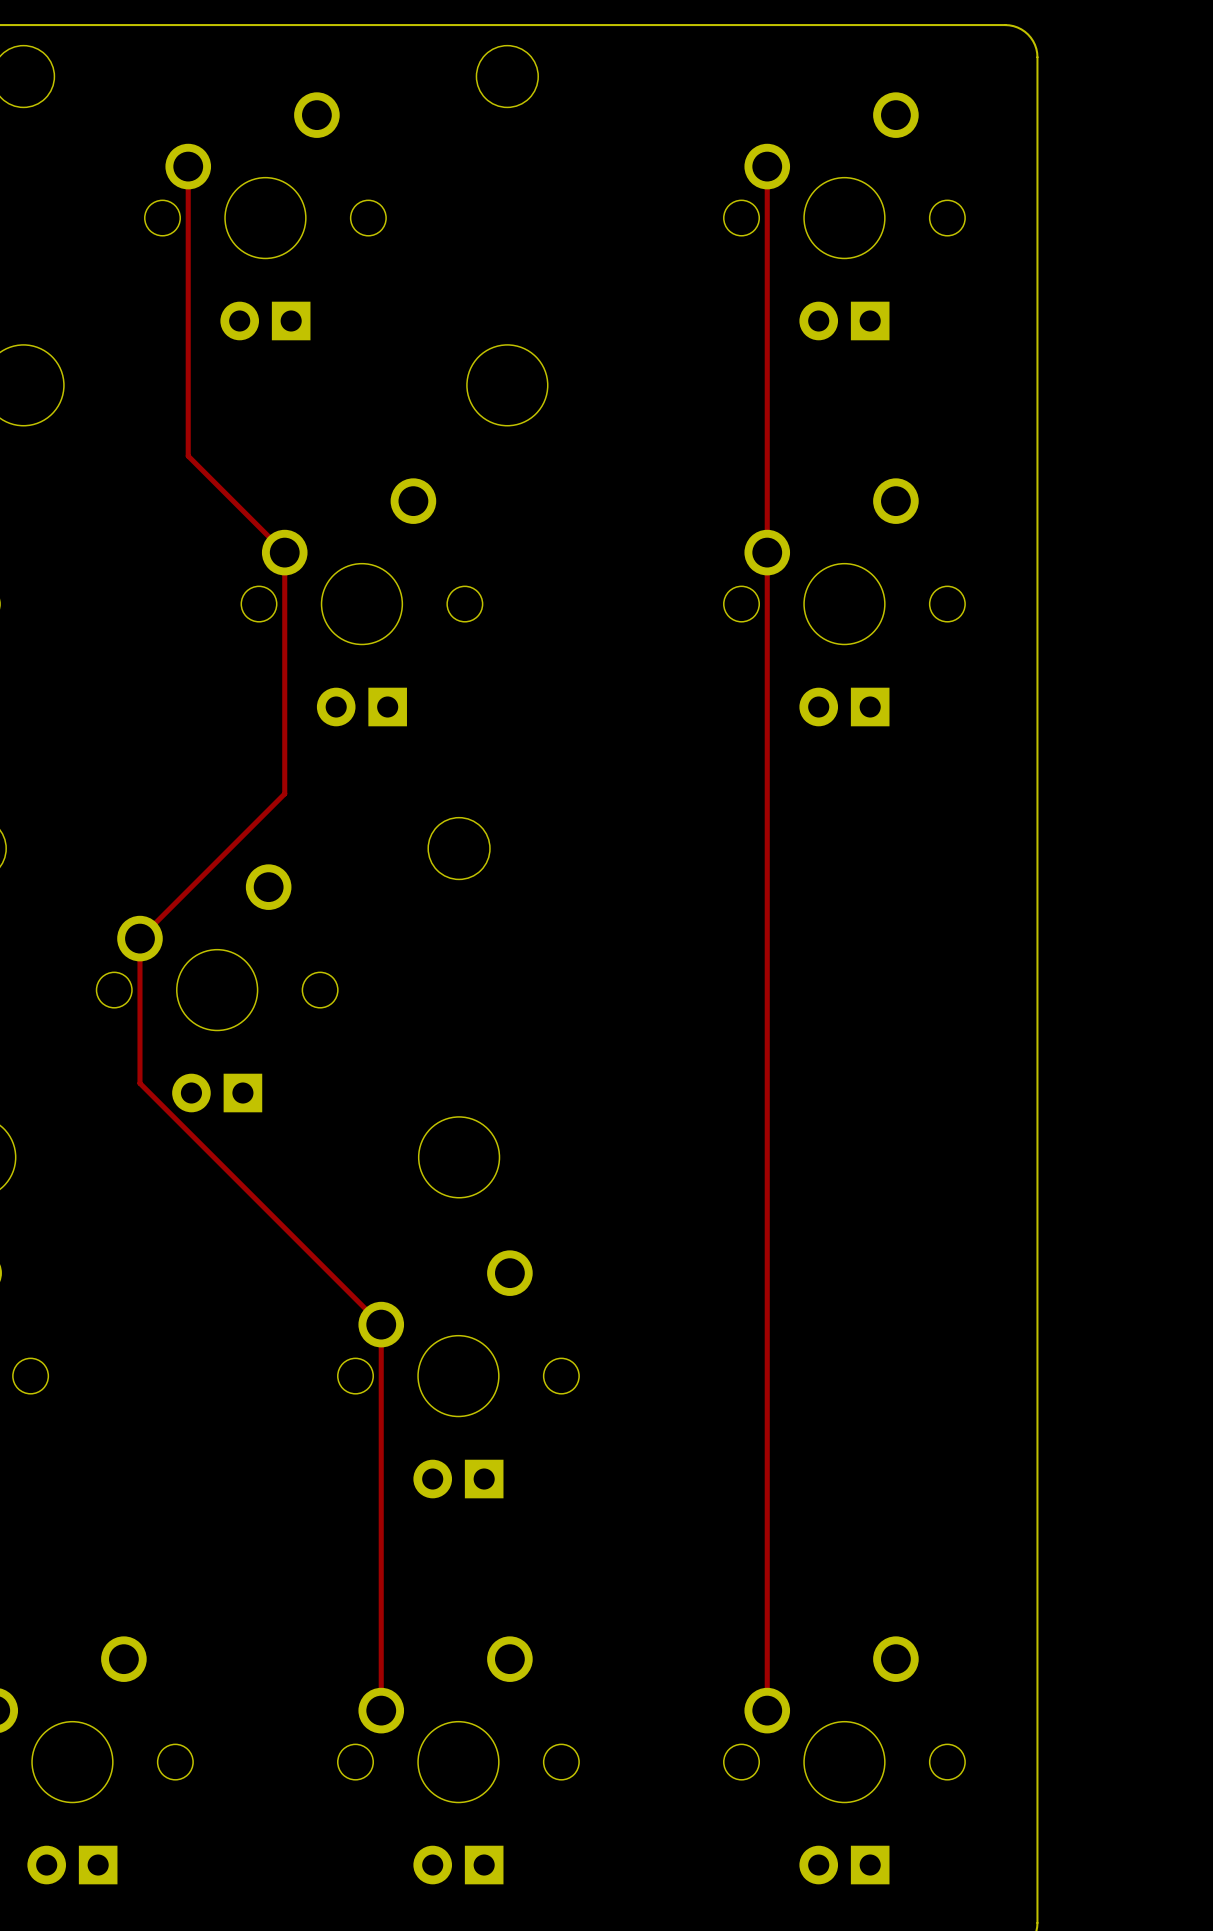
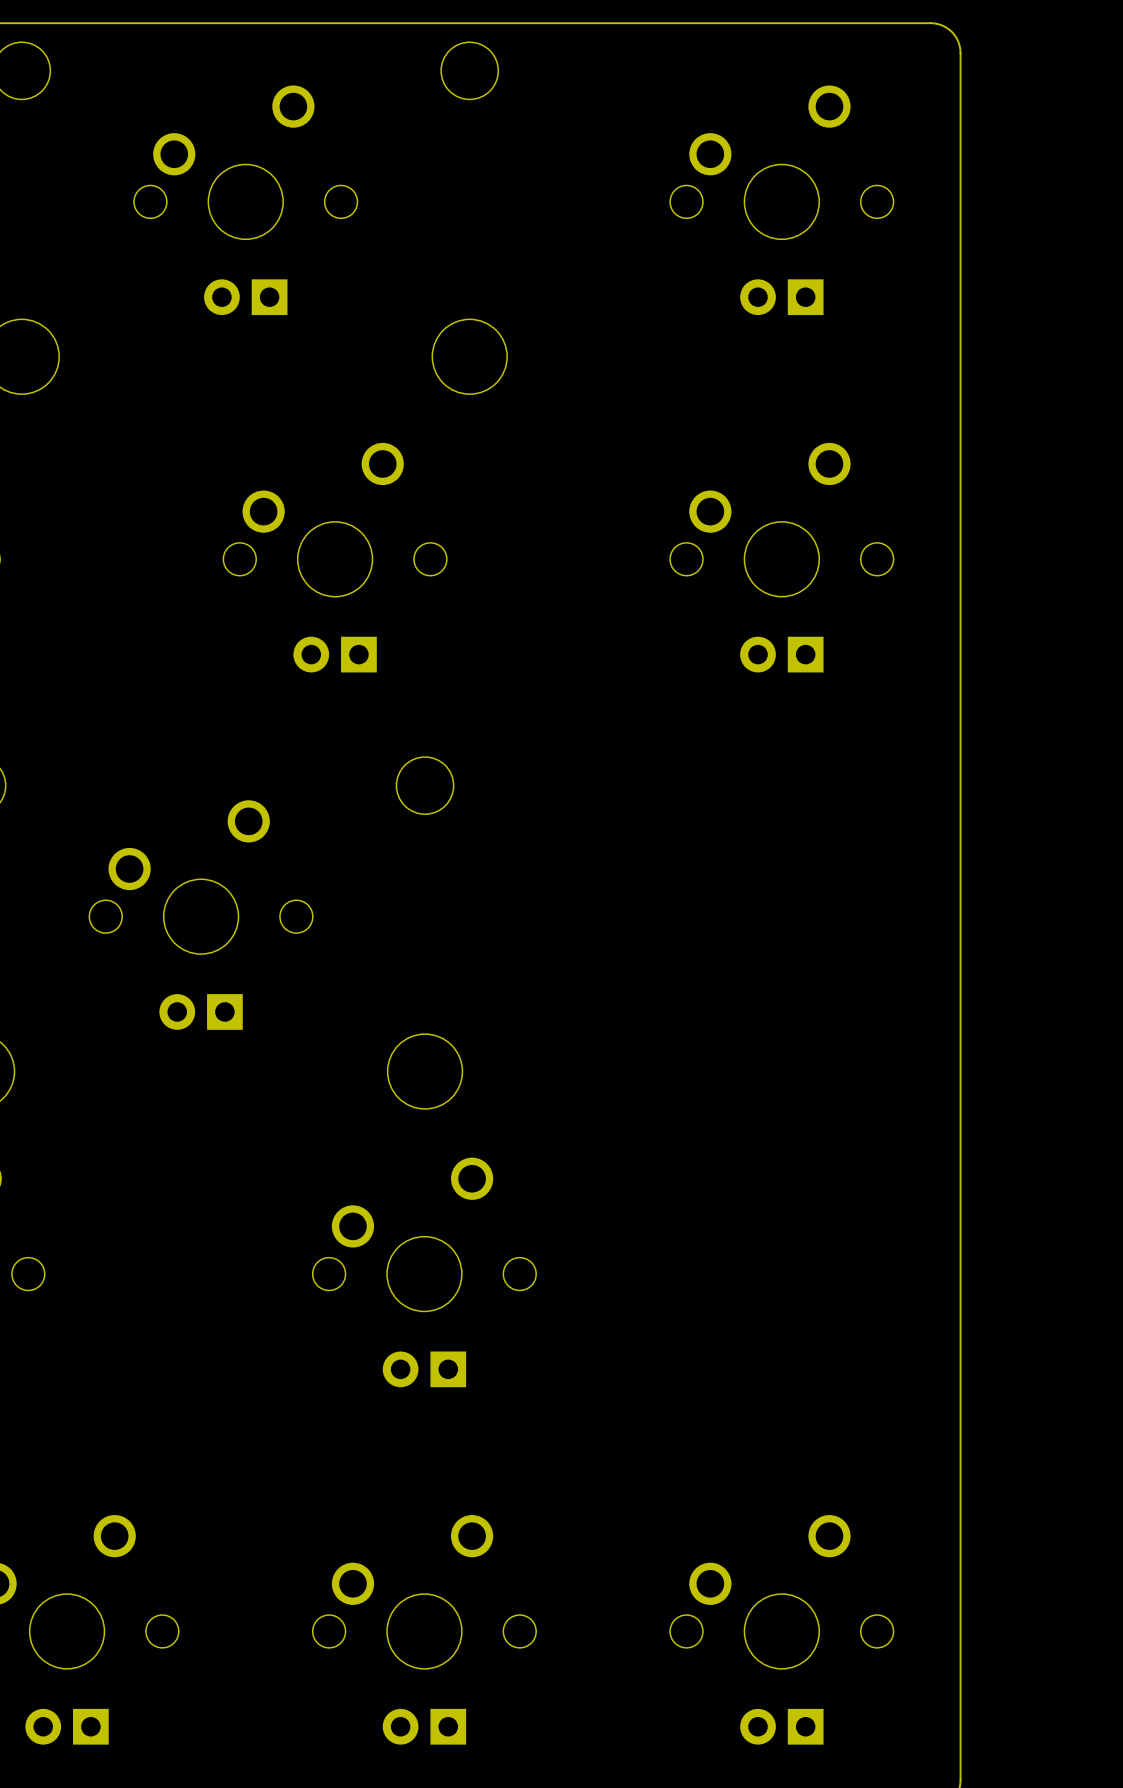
track: (188, 166) (188, 456) (284, 552) (284, 793) (139, 938) (139, 1083) (381, 1324) (381, 1710) -> none
track: (767, 166) (767, 1710) -> none

